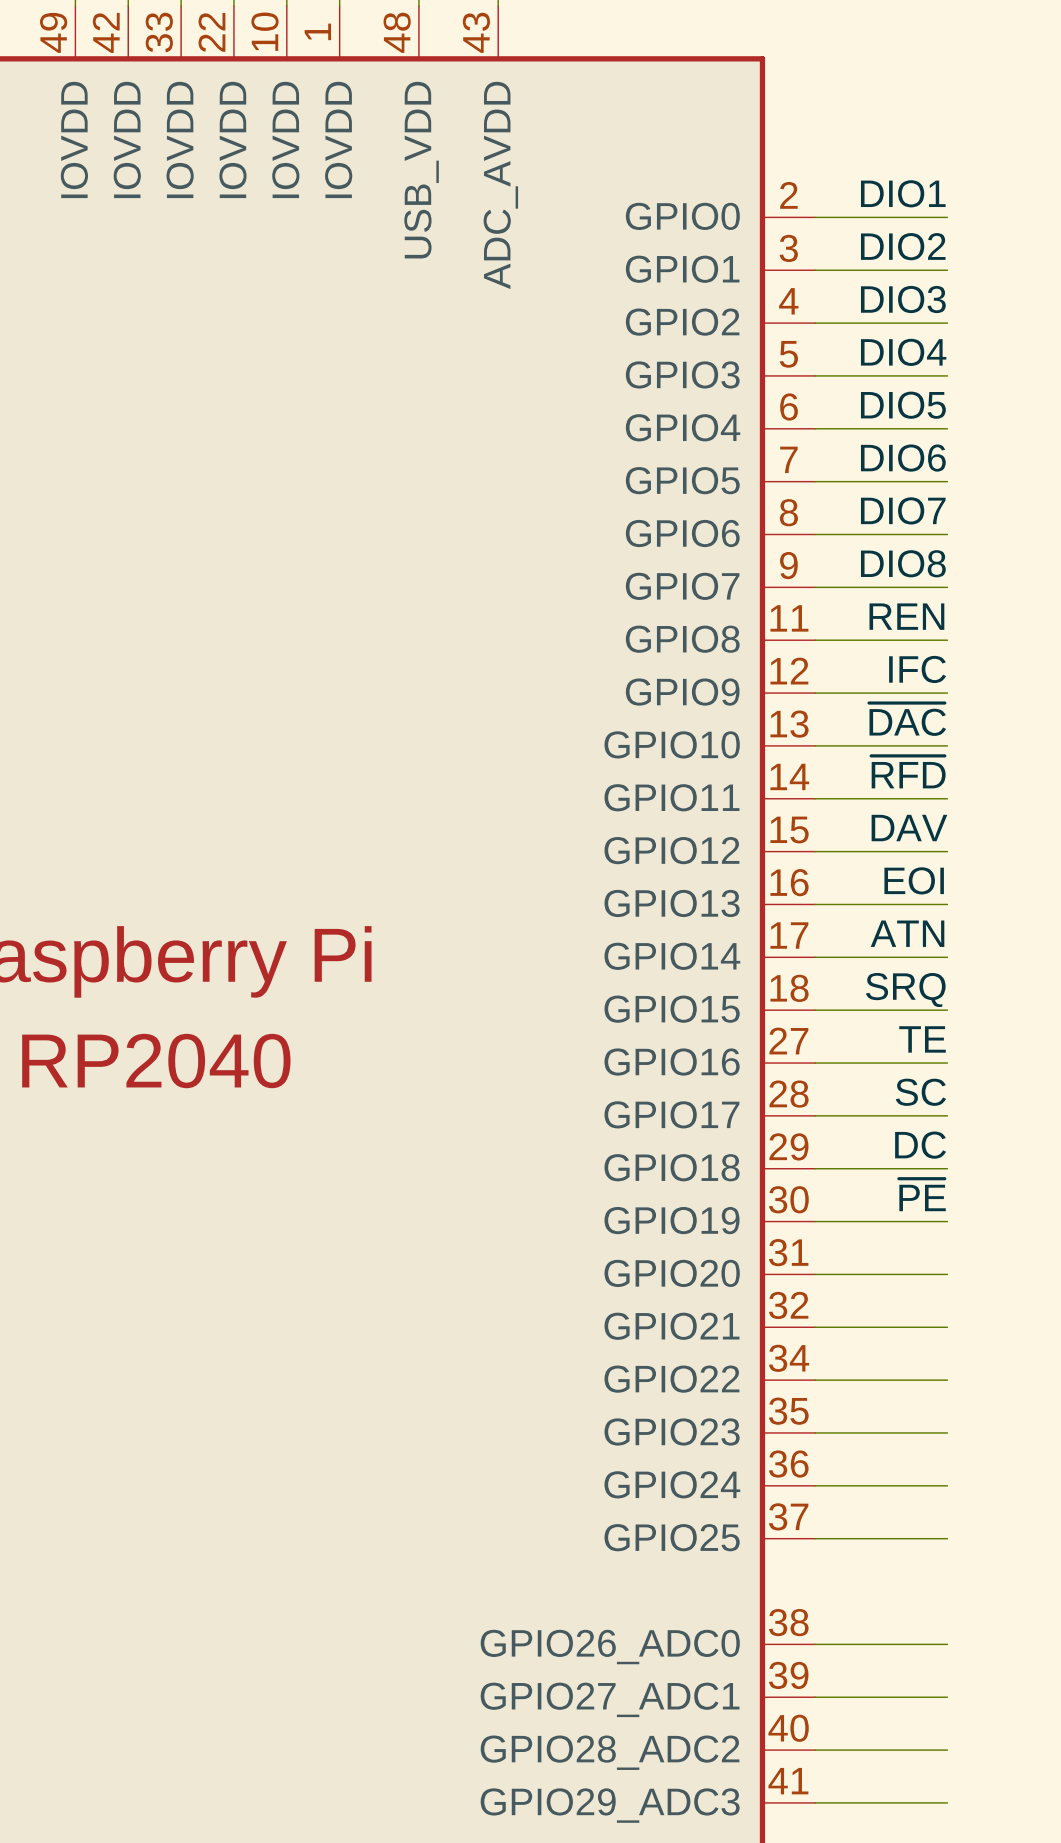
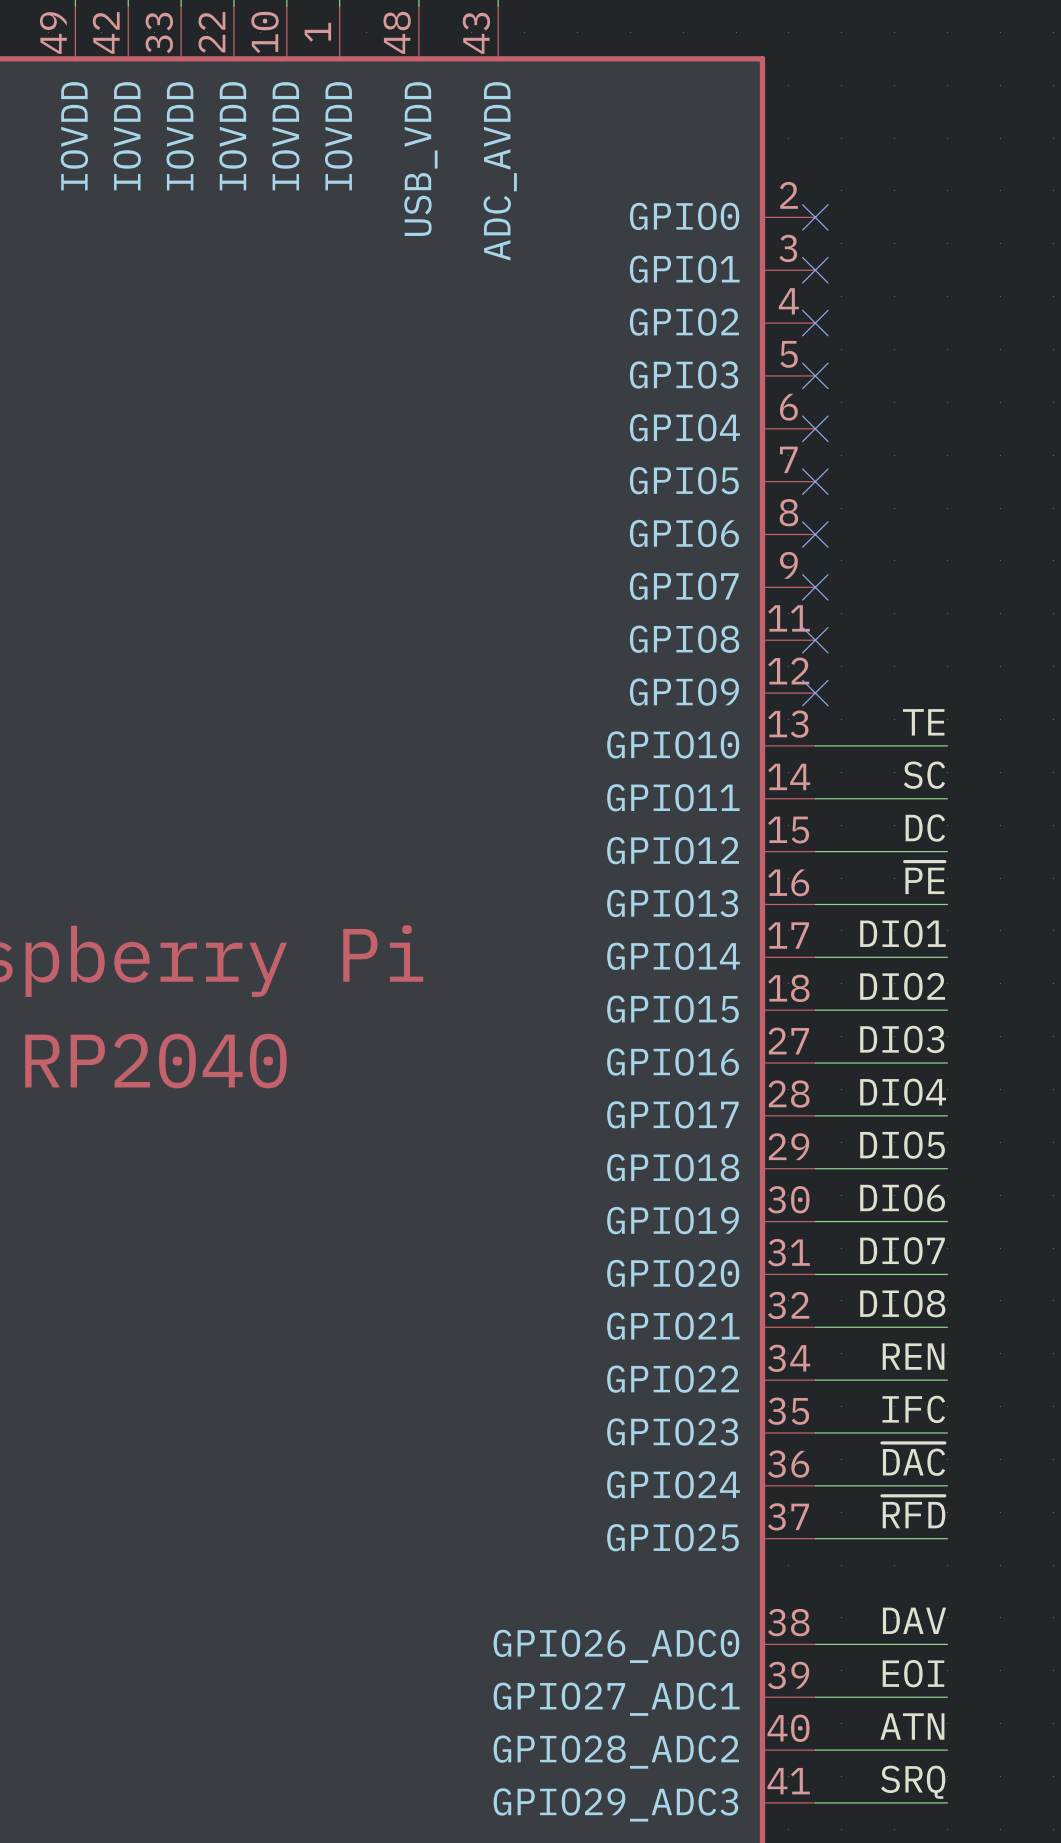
label: DIO1 (903, 193) -> none
wire: (815, 217) (947, 217) -> none
no-connect mark: none -> (815, 217)
label: DIO2 (903, 246) -> none
wire: (815, 270) (947, 270) -> none
no-connect mark: none -> (815, 270)
label: DIO3 (903, 299) -> none
wire: (815, 323) (947, 323) -> none
no-connect mark: none -> (815, 323)
label: DIO4 (903, 352) -> none
wire: (815, 375) (947, 375) -> none
no-connect mark: none -> (815, 375)
label: DIO5 (903, 405) -> none
wire: (815, 428) (947, 428) -> none
no-connect mark: none -> (815, 428)
label: DIO6 (903, 458) -> none
wire: (815, 481) (947, 481) -> none
no-connect mark: none -> (815, 481)
label: DIO7 (903, 510) -> none
wire: (815, 534) (947, 534) -> none
no-connect mark: none -> (815, 534)
label: DIO8 (903, 563) -> none
wire: (815, 587) (947, 587) -> none
no-connect mark: none -> (815, 587)
label: REN (906, 616) -> none
wire: (815, 640) (947, 640) -> none
no-connect mark: none -> (815, 640)
label: IFC (917, 669) -> none
wire: (815, 693) (947, 693) -> none
no-connect mark: none -> (815, 693)
label: ~{DAC} (907, 719) -> TE (923, 722)
label: ~{RFD} (908, 772) -> SC (924, 775)
label: DAV (909, 828) -> DC (925, 828)
label: EOI (914, 880) -> ~{PE} (924, 877)
label: ATN (907, 933) -> DIO1 (902, 933)
label: SRQ (905, 990) -> DIO2 (902, 986)
label: TE (922, 1039) -> DIO3 (902, 1039)
label: SC (920, 1092) -> DIO4 (903, 1092)
label: DC (920, 1145) -> DIO5 (902, 1145)
label: ~{PE} (922, 1194) -> DIO6 (902, 1197)
label: none -> DIO7 (902, 1250)
label: none -> DIO8 (902, 1303)
label: none -> REN (913, 1356)
label: none -> IFC (913, 1409)
label: none -> ~{DAC} (913, 1459)
label: none -> ~{RFD} (913, 1512)
label: none -> DAV (914, 1620)
label: none -> EOI (913, 1673)
label: none -> ATN (912, 1726)
label: none -> SRQ (913, 1782)

